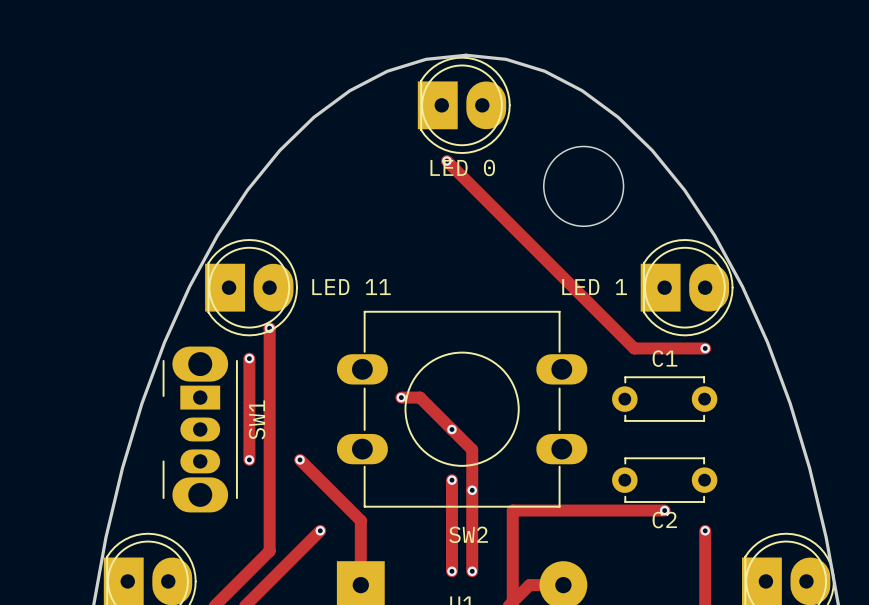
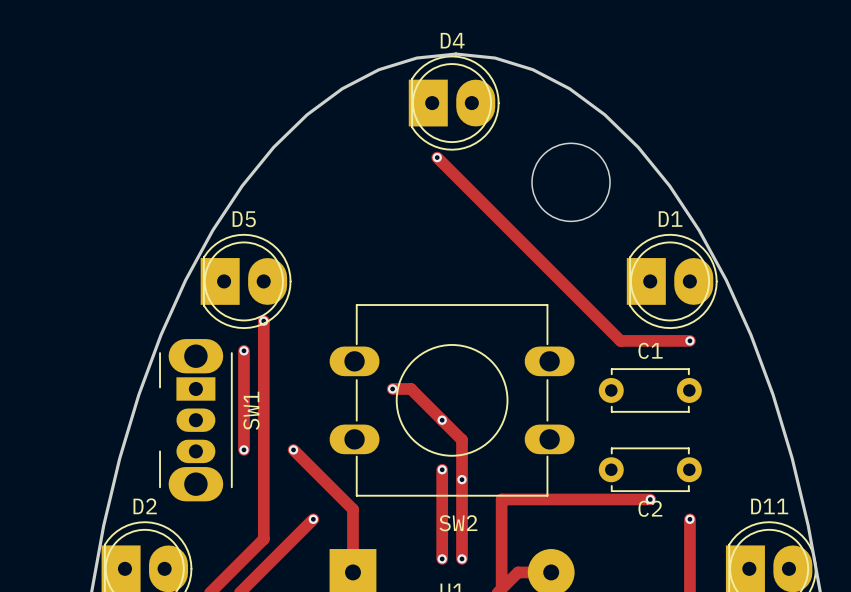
D4 name: none -> D4 (452, 40)
D4 value: LED 0 (462, 167) -> none
D1 name: none -> D1 (670, 219)
D5 name: none -> D5 (244, 219)
D5 value: LED 11 (351, 287) -> none
D1 value: LED 1 (594, 287) -> none
D2 name: none -> D2 (145, 506)
D11 name: none -> D11 (769, 506)

